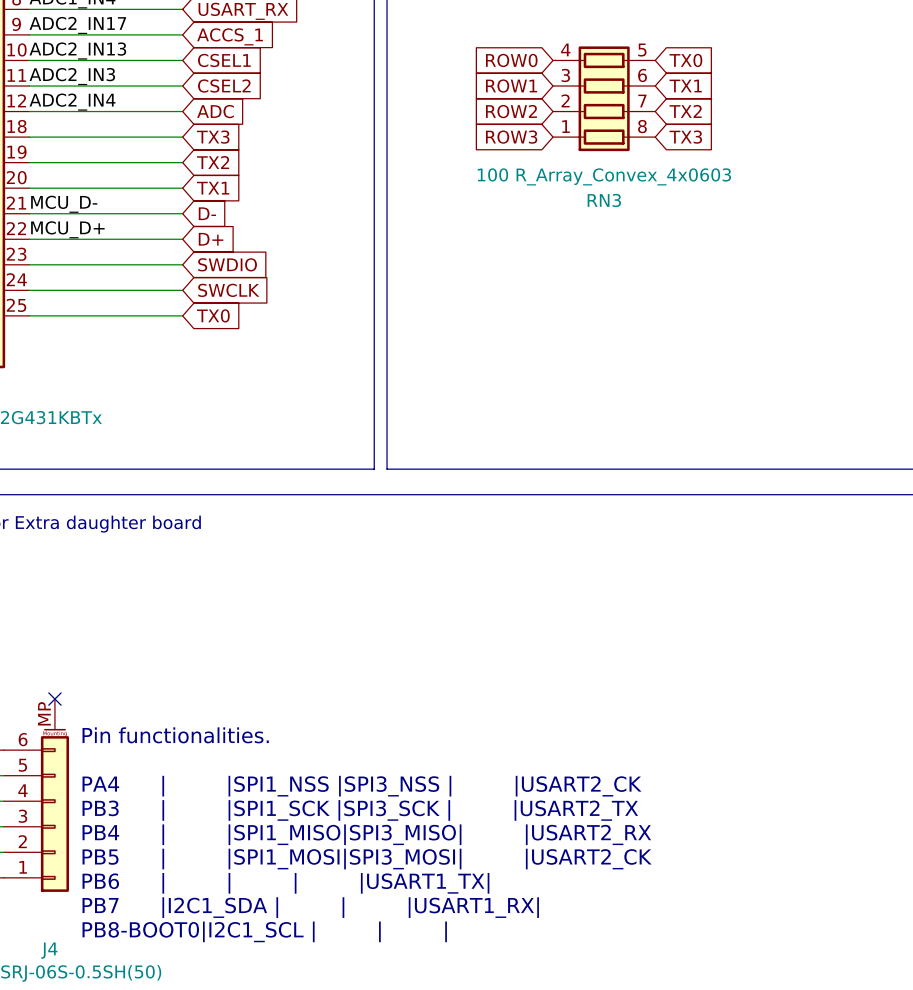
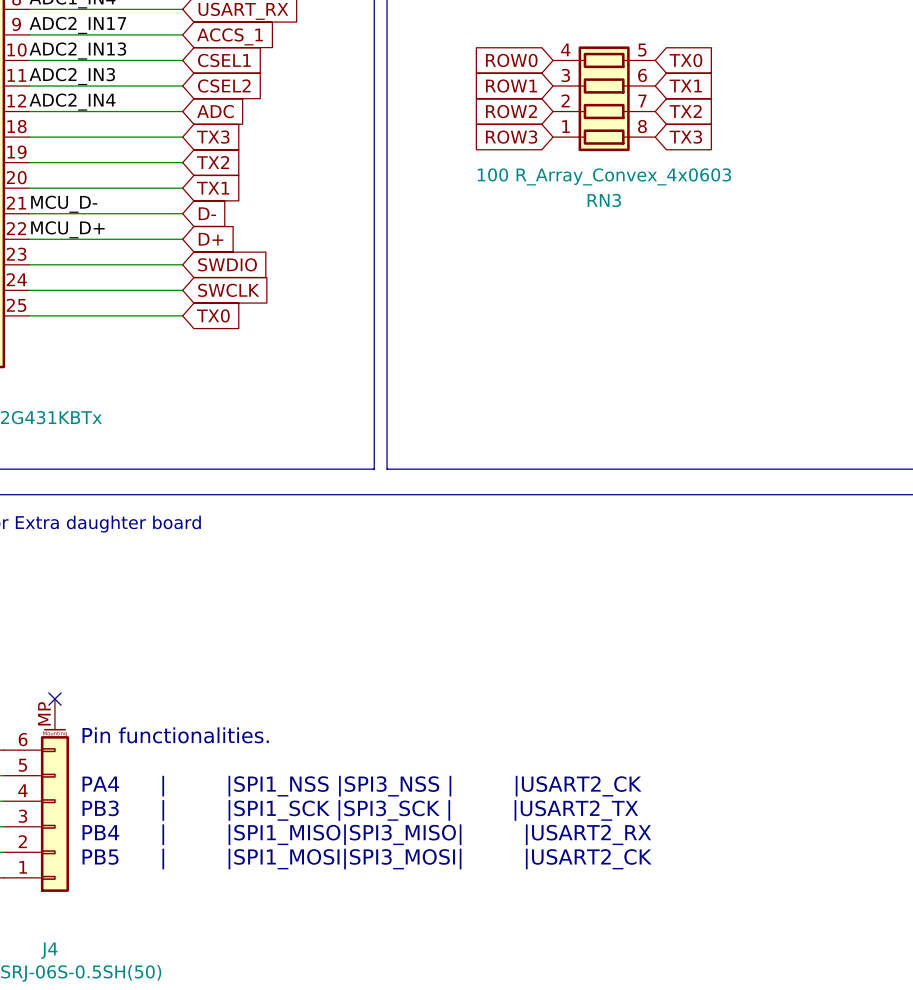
text: PB6 | | | |USART1_TX| (285, 883) -> none
text: PB7 |I2C1_SDA | | |USART1_RX| (310, 907) -> none
text: PB8-BOOT0|I2C1_SCL | | | (264, 931) -> none

